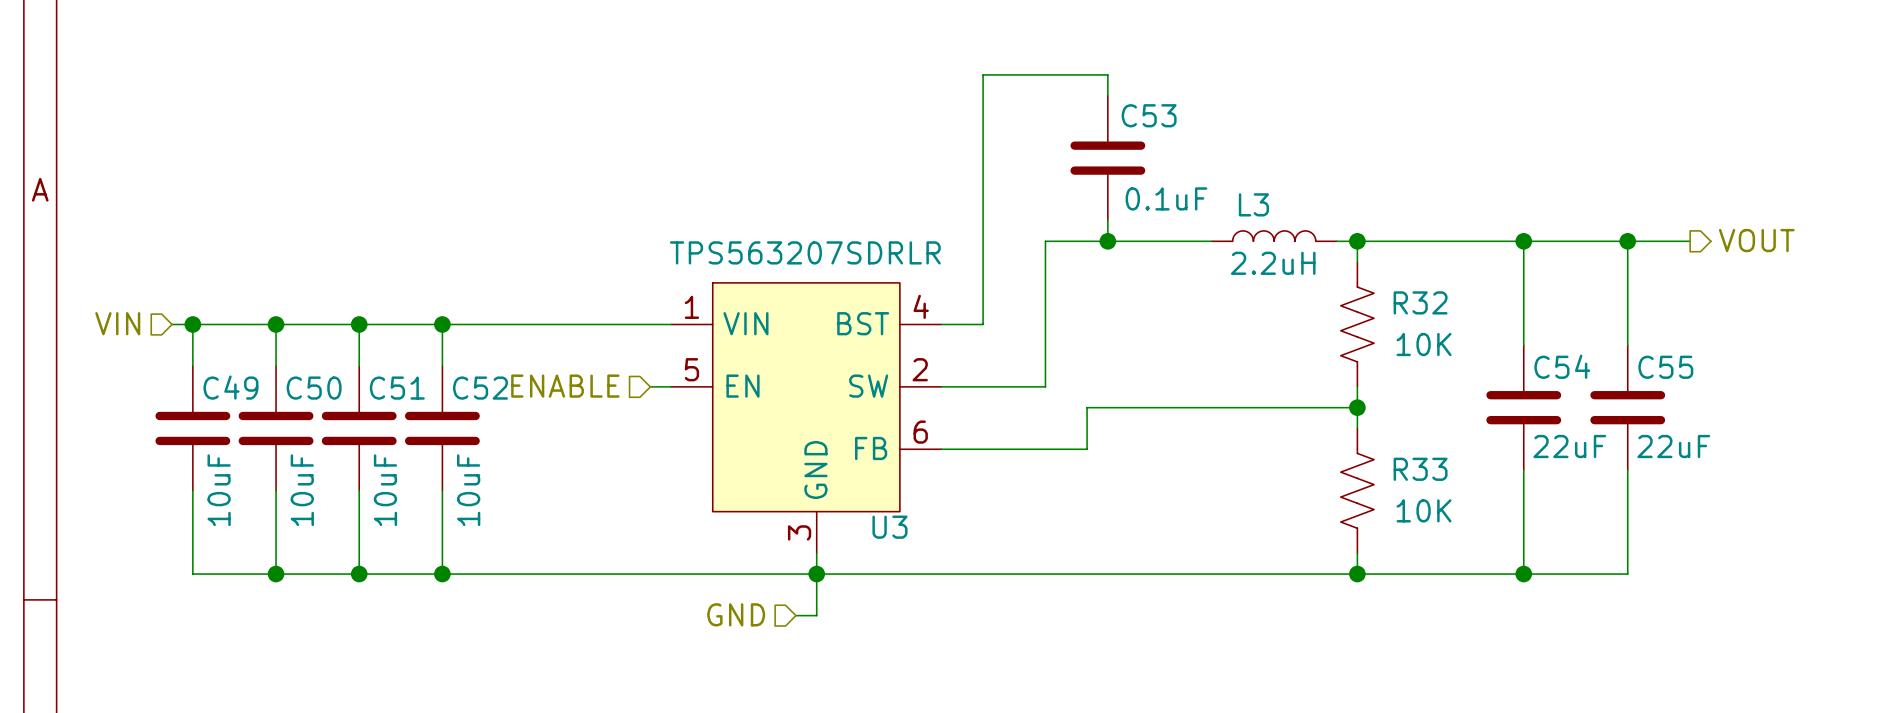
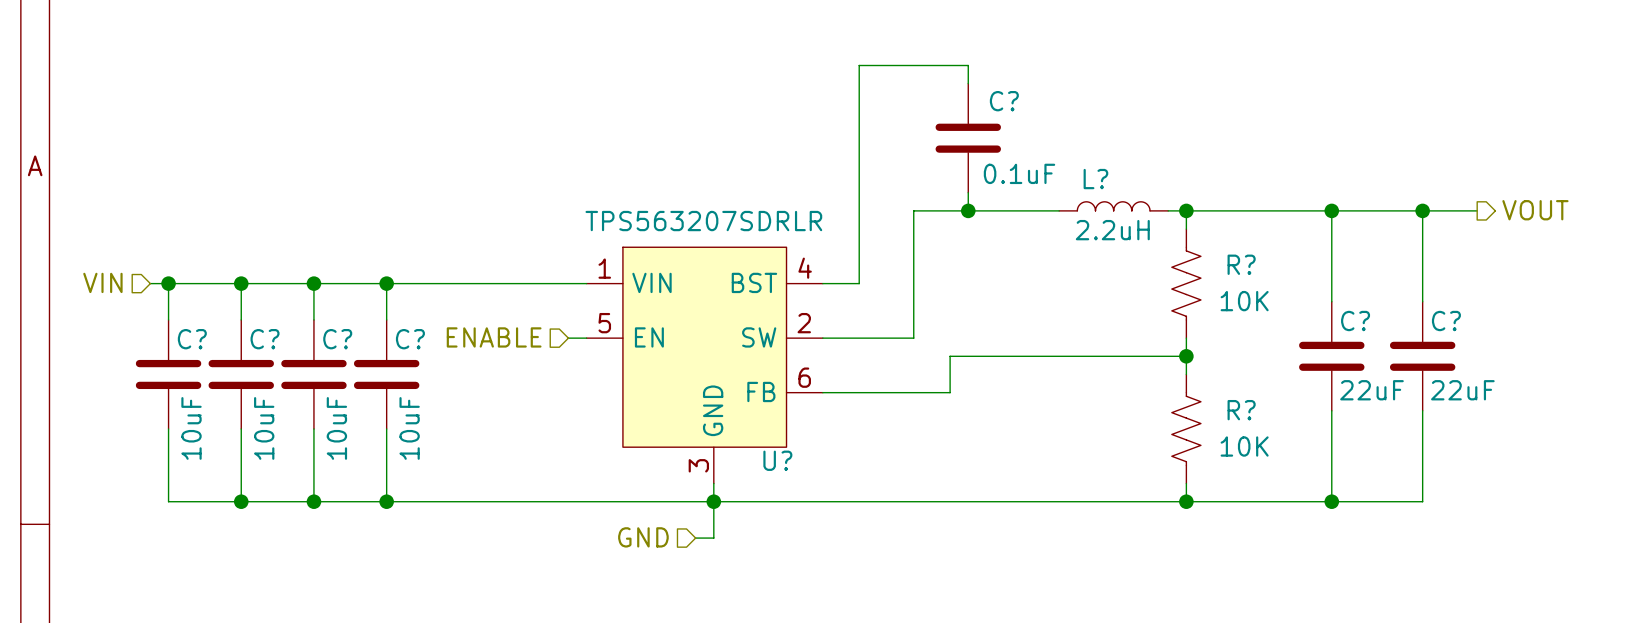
C53 name: C53 (1149, 115) -> C? (1004, 101)
L3 name: L3 (1253, 204) -> L? (1095, 179)
R32 name: R32 (1420, 302) -> R? (1241, 264)
C54 name: C54 (1562, 366) -> C? (1355, 321)
C55 name: C55 (1665, 367) -> C? (1446, 321)
C49 name: C49 (230, 387) -> C? (192, 339)
C50 name: C50 (314, 388) -> C? (265, 339)
C51 name: C51 (397, 388) -> C? (337, 339)
C52 name: C52 (480, 388) -> C? (410, 339)
R33 name: R33 (1420, 469) -> R? (1241, 410)
U3 name: U3 (890, 527) -> U? (777, 460)

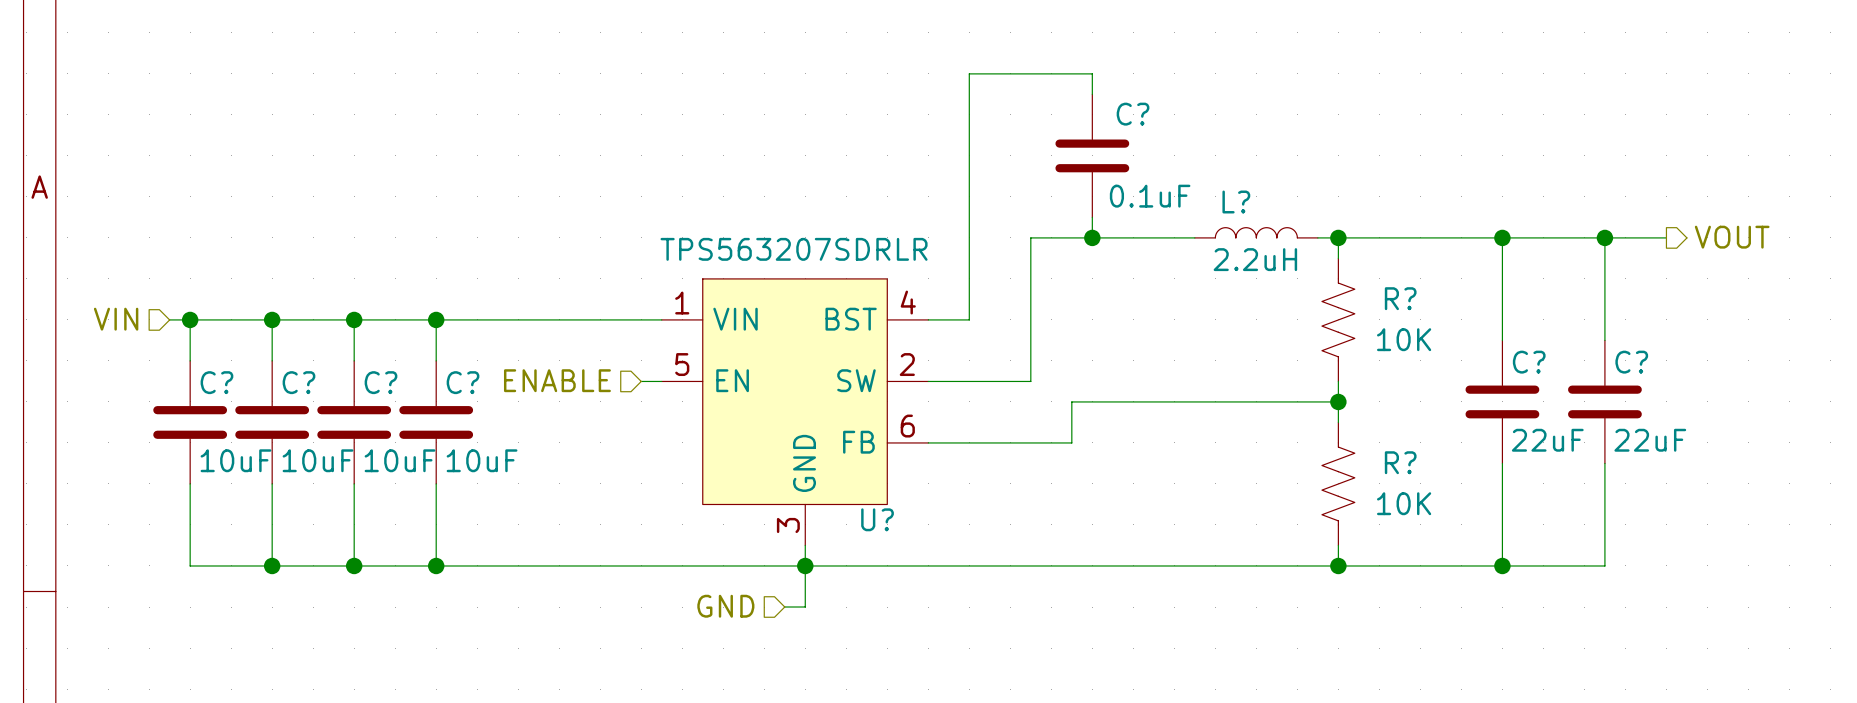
C? text rotation: 0° (191, 428) -> 90° clockwise (236, 460)
C? text rotation: 0° (264, 428) -> 90° clockwise (318, 460)
C? text rotation: 0° (336, 428) -> 90° clockwise (400, 460)
C? text rotation: 0° (409, 428) -> 90° clockwise (482, 460)

